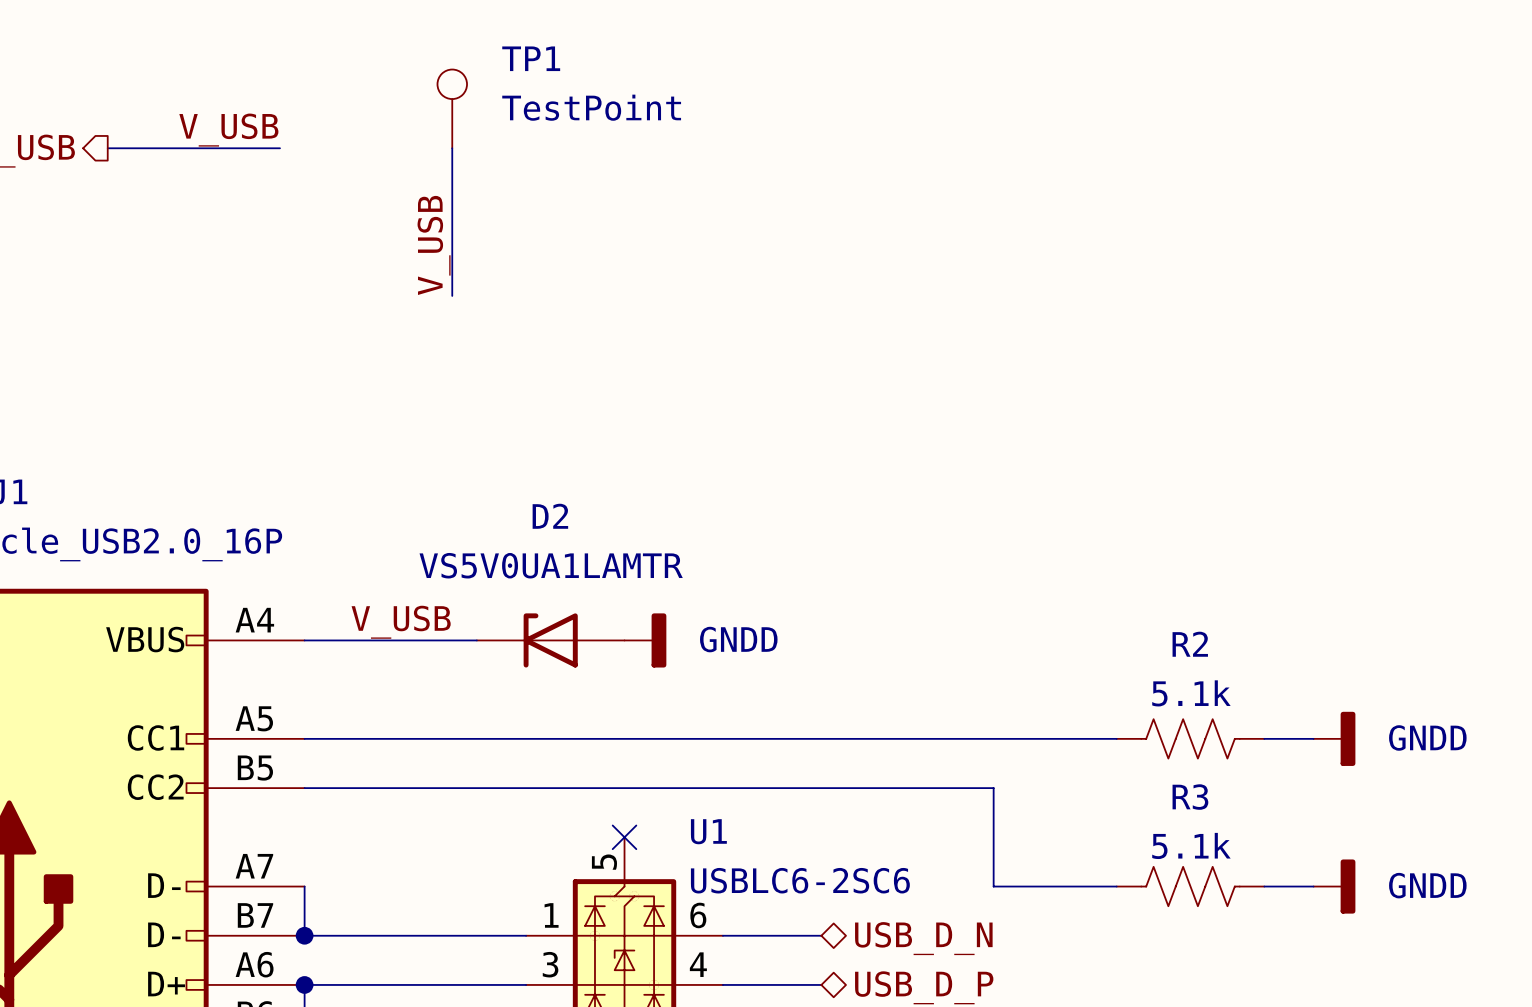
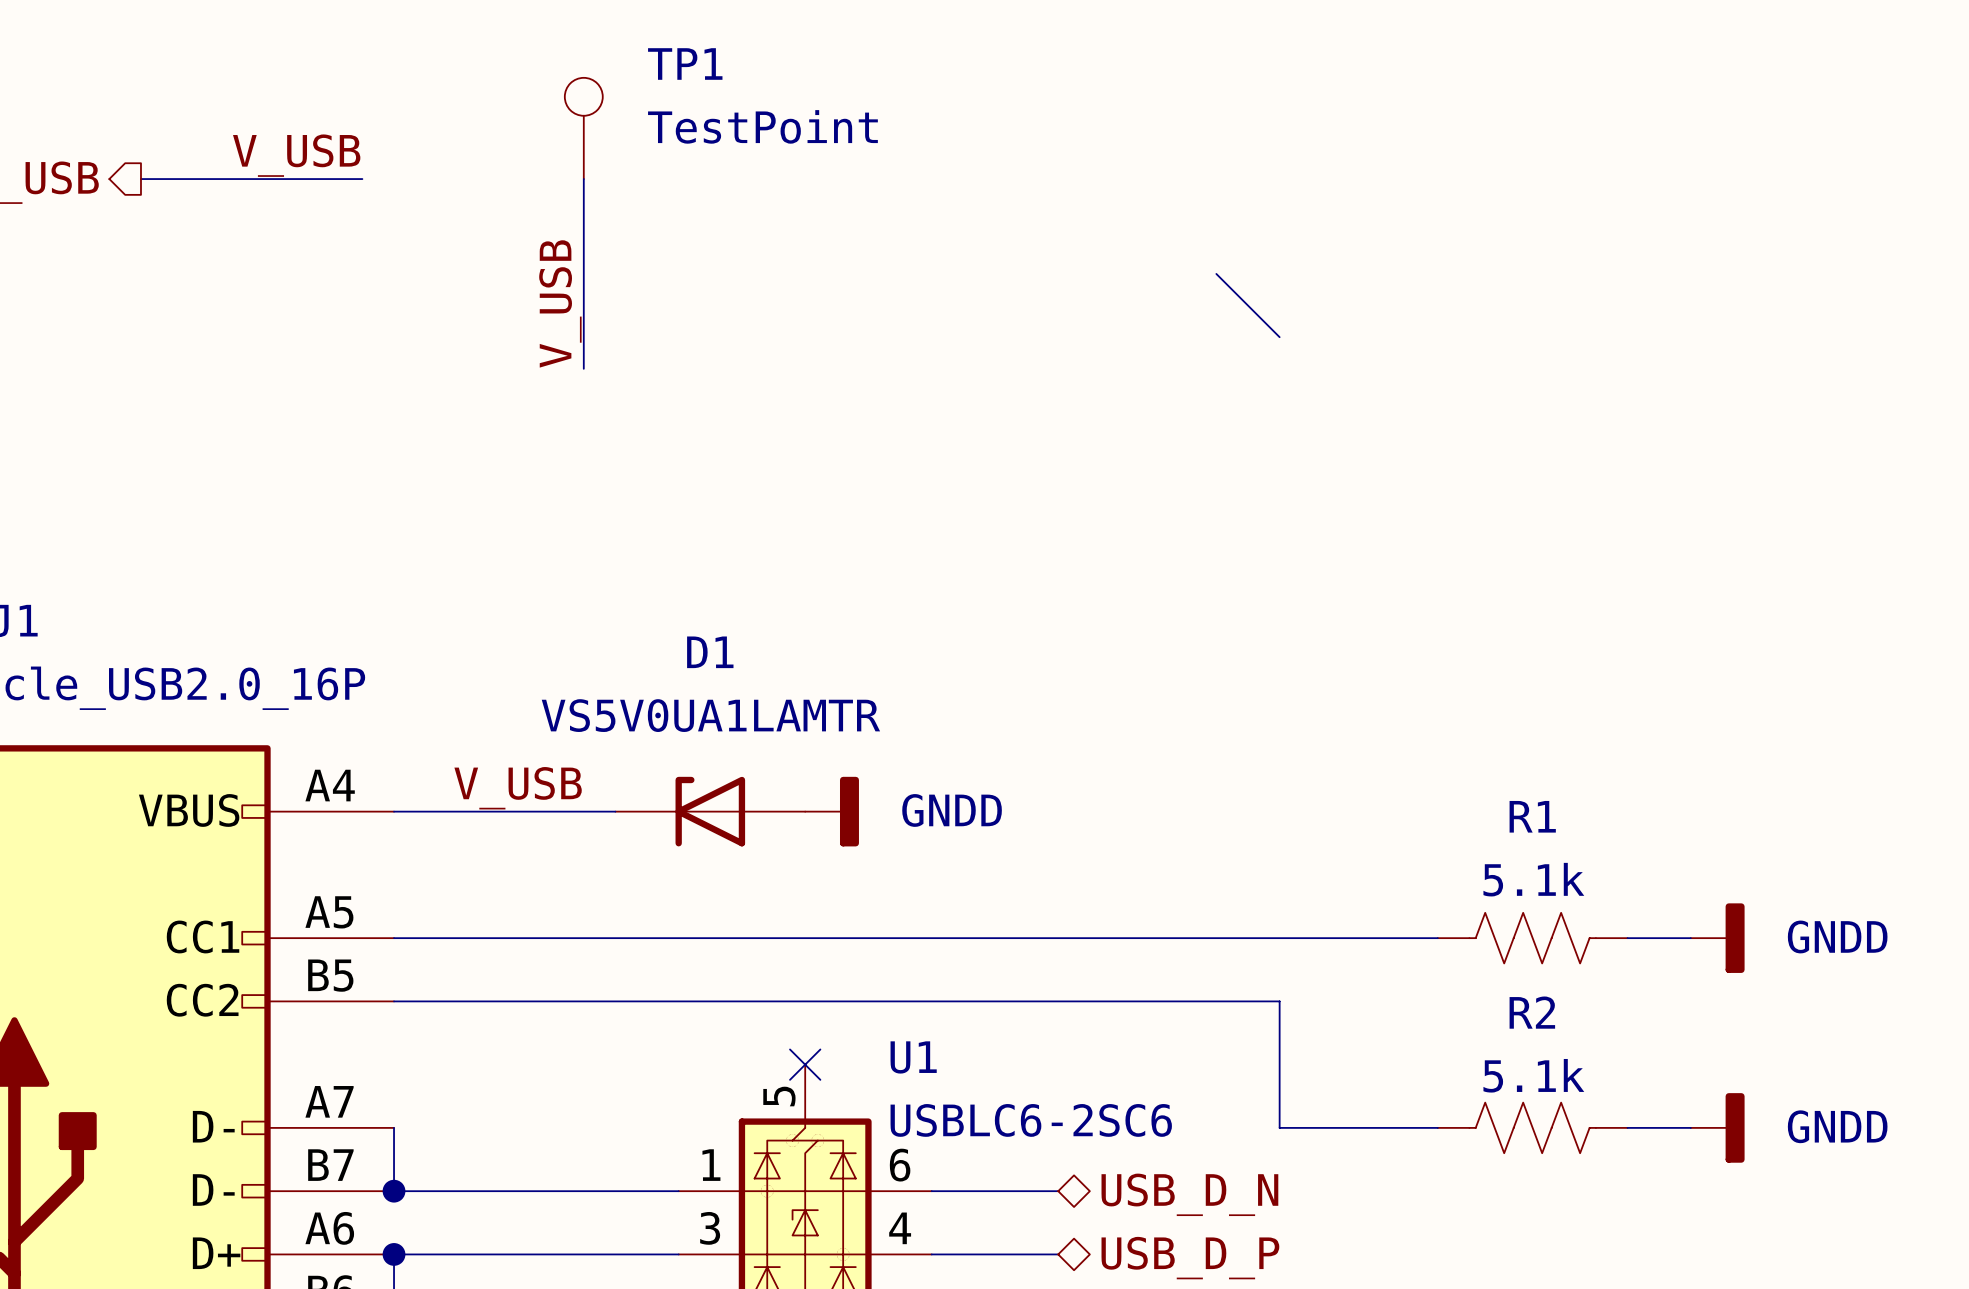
wire: none -> (1216, 273) (1279, 337)
D2 name: D2 (550, 516) -> D1 (710, 652)
R2 name: R2 (1190, 644) -> R1 (1532, 816)
R3 name: R3 (1190, 797) -> R2 (1532, 1012)

